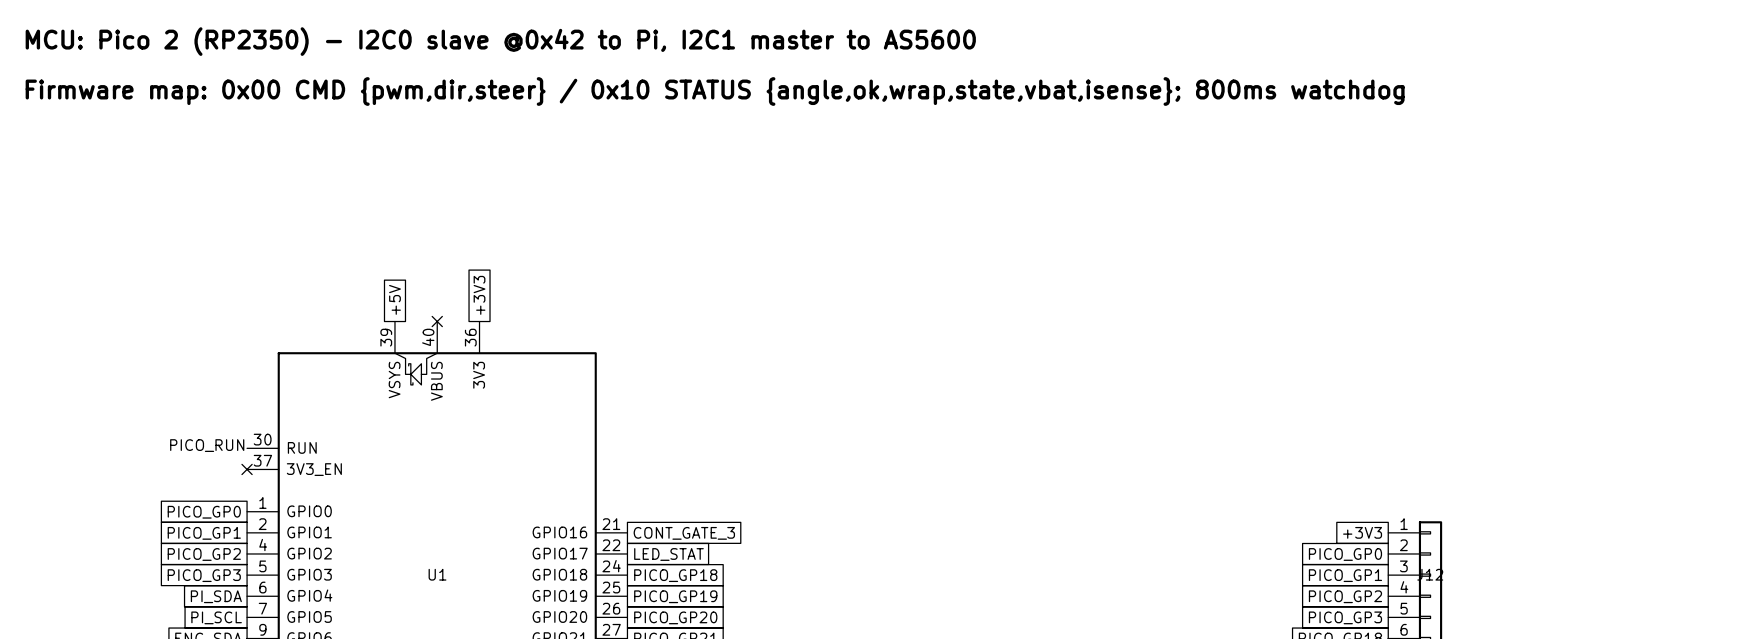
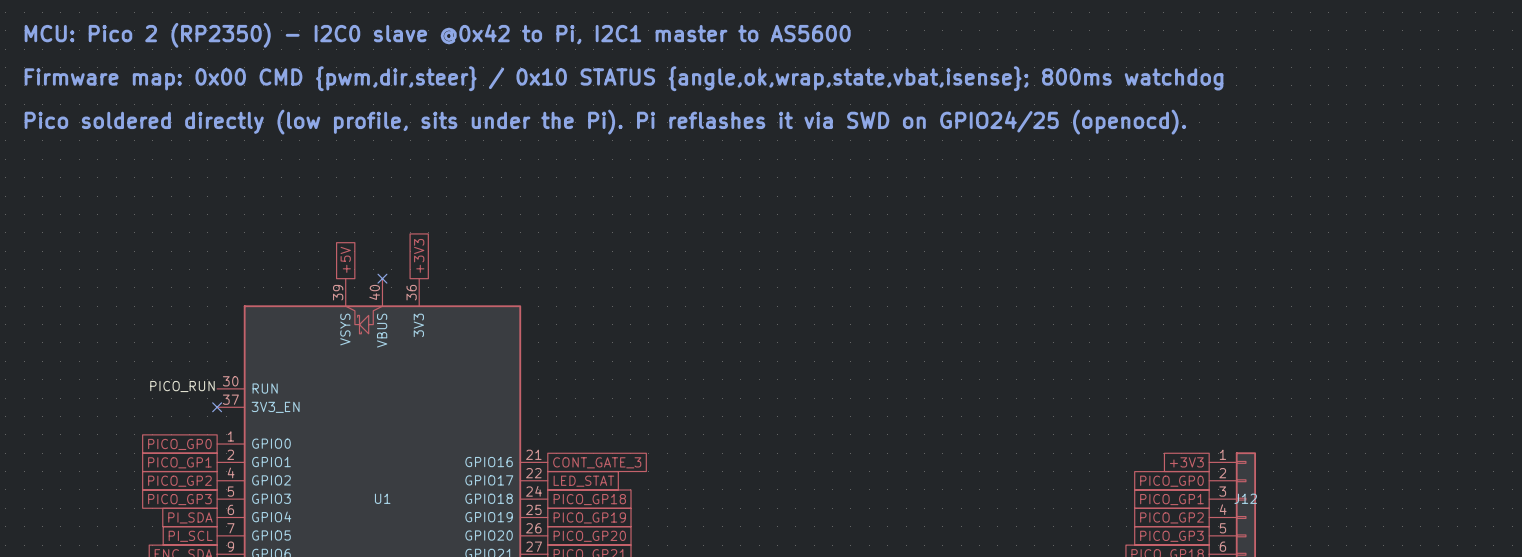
text: none -> Pico soldered directly (low profile, sits under the Pi). Pi reflashes it via SWD on GPIO24/25 (openocd). (605, 122)

